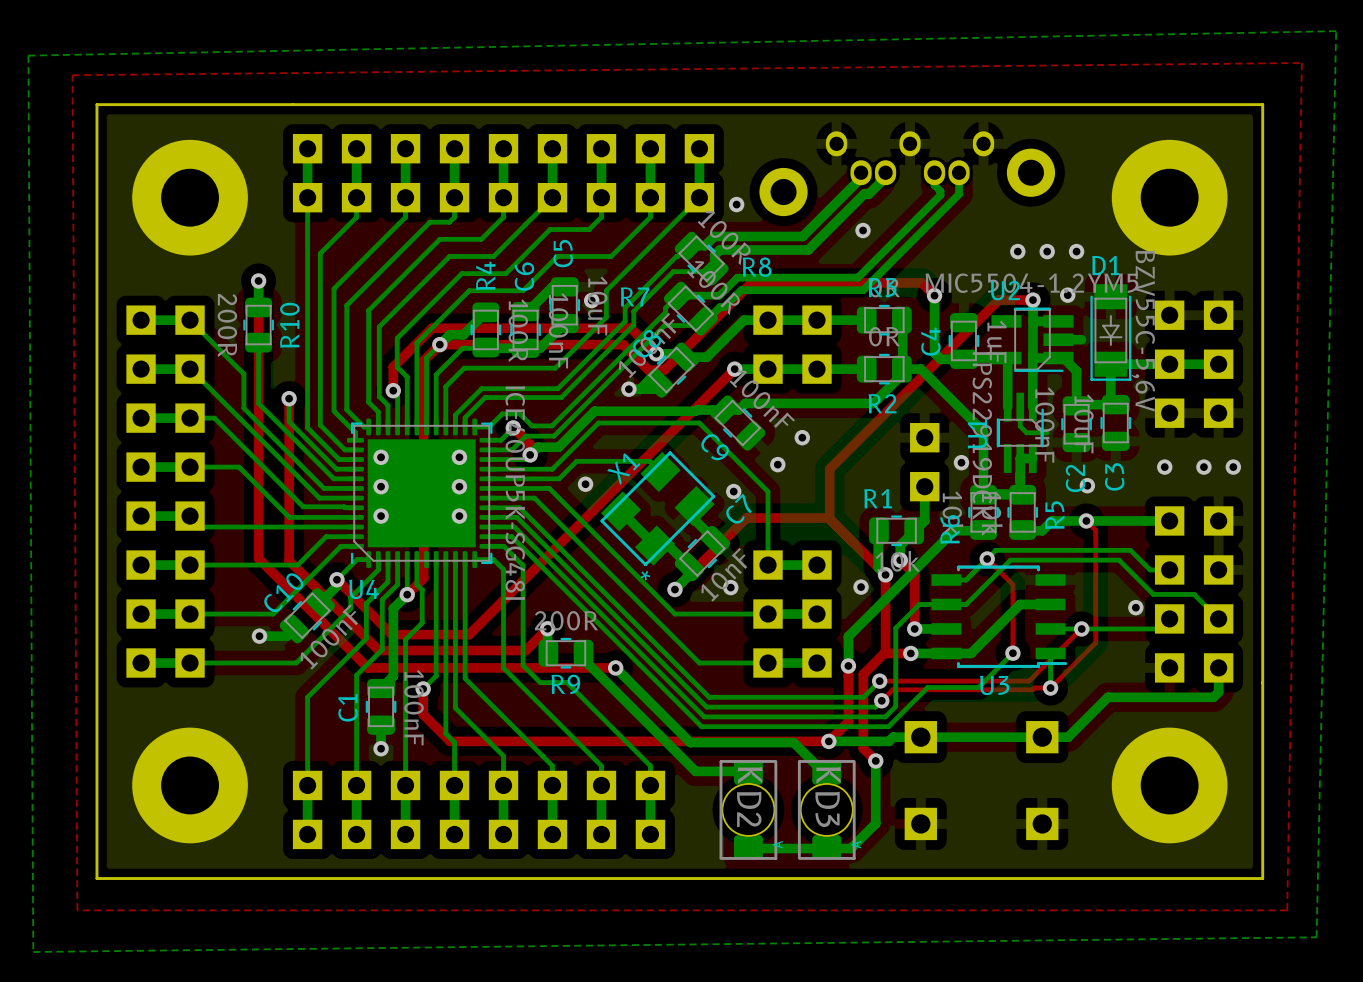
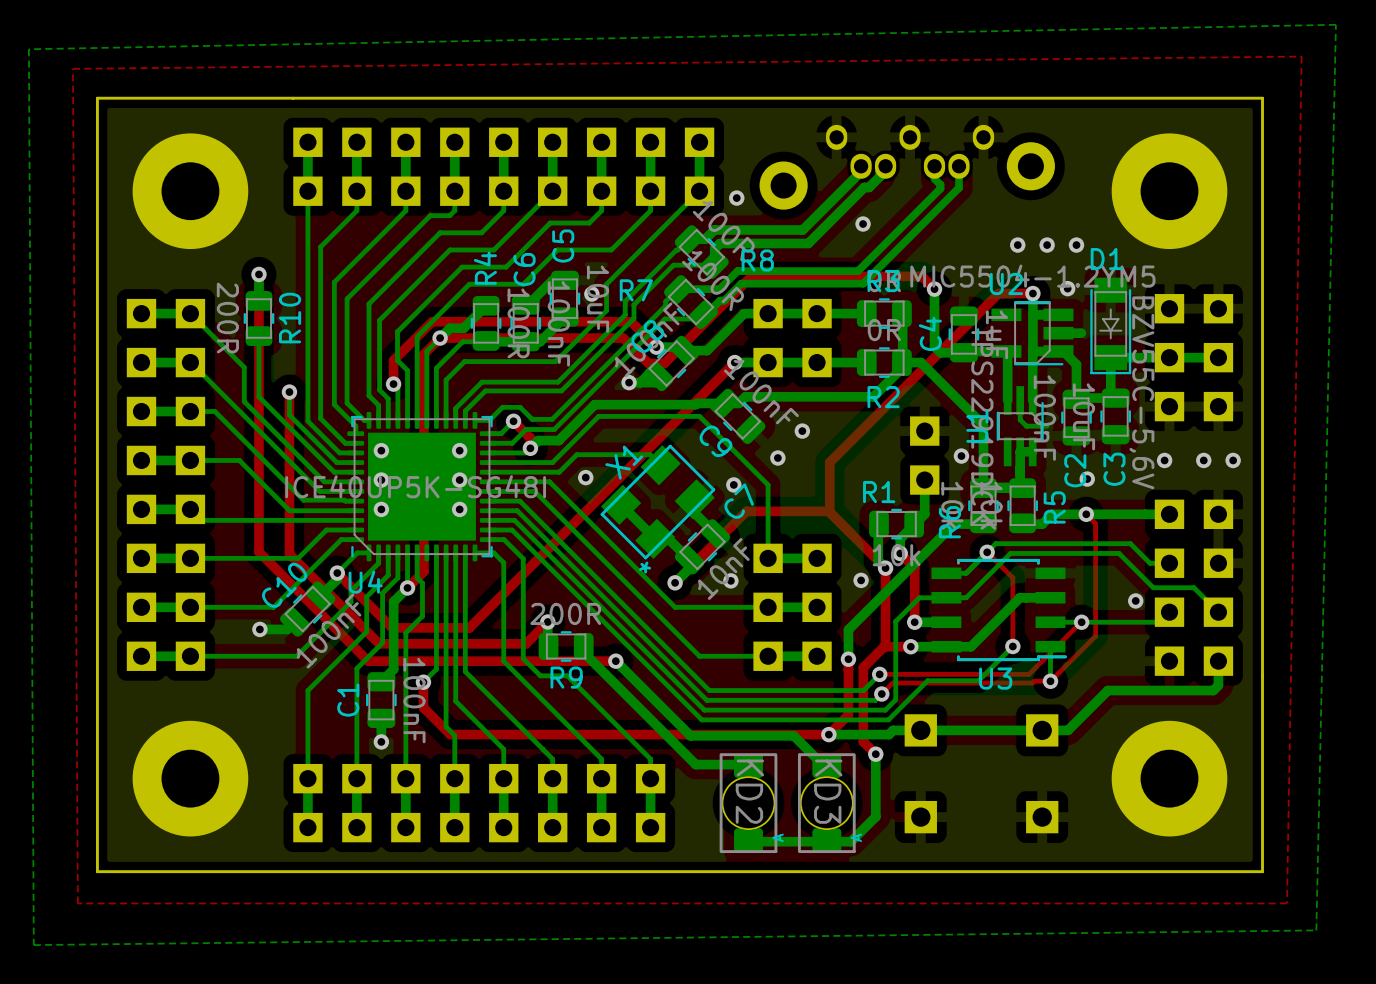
D1 value position: BZV55C-5,6V (1143, 331) -> BZV55C-5,6V (1141, 392)
U4 value rotation: 0° (515, 493) -> 90° counterclockwise (415, 486)

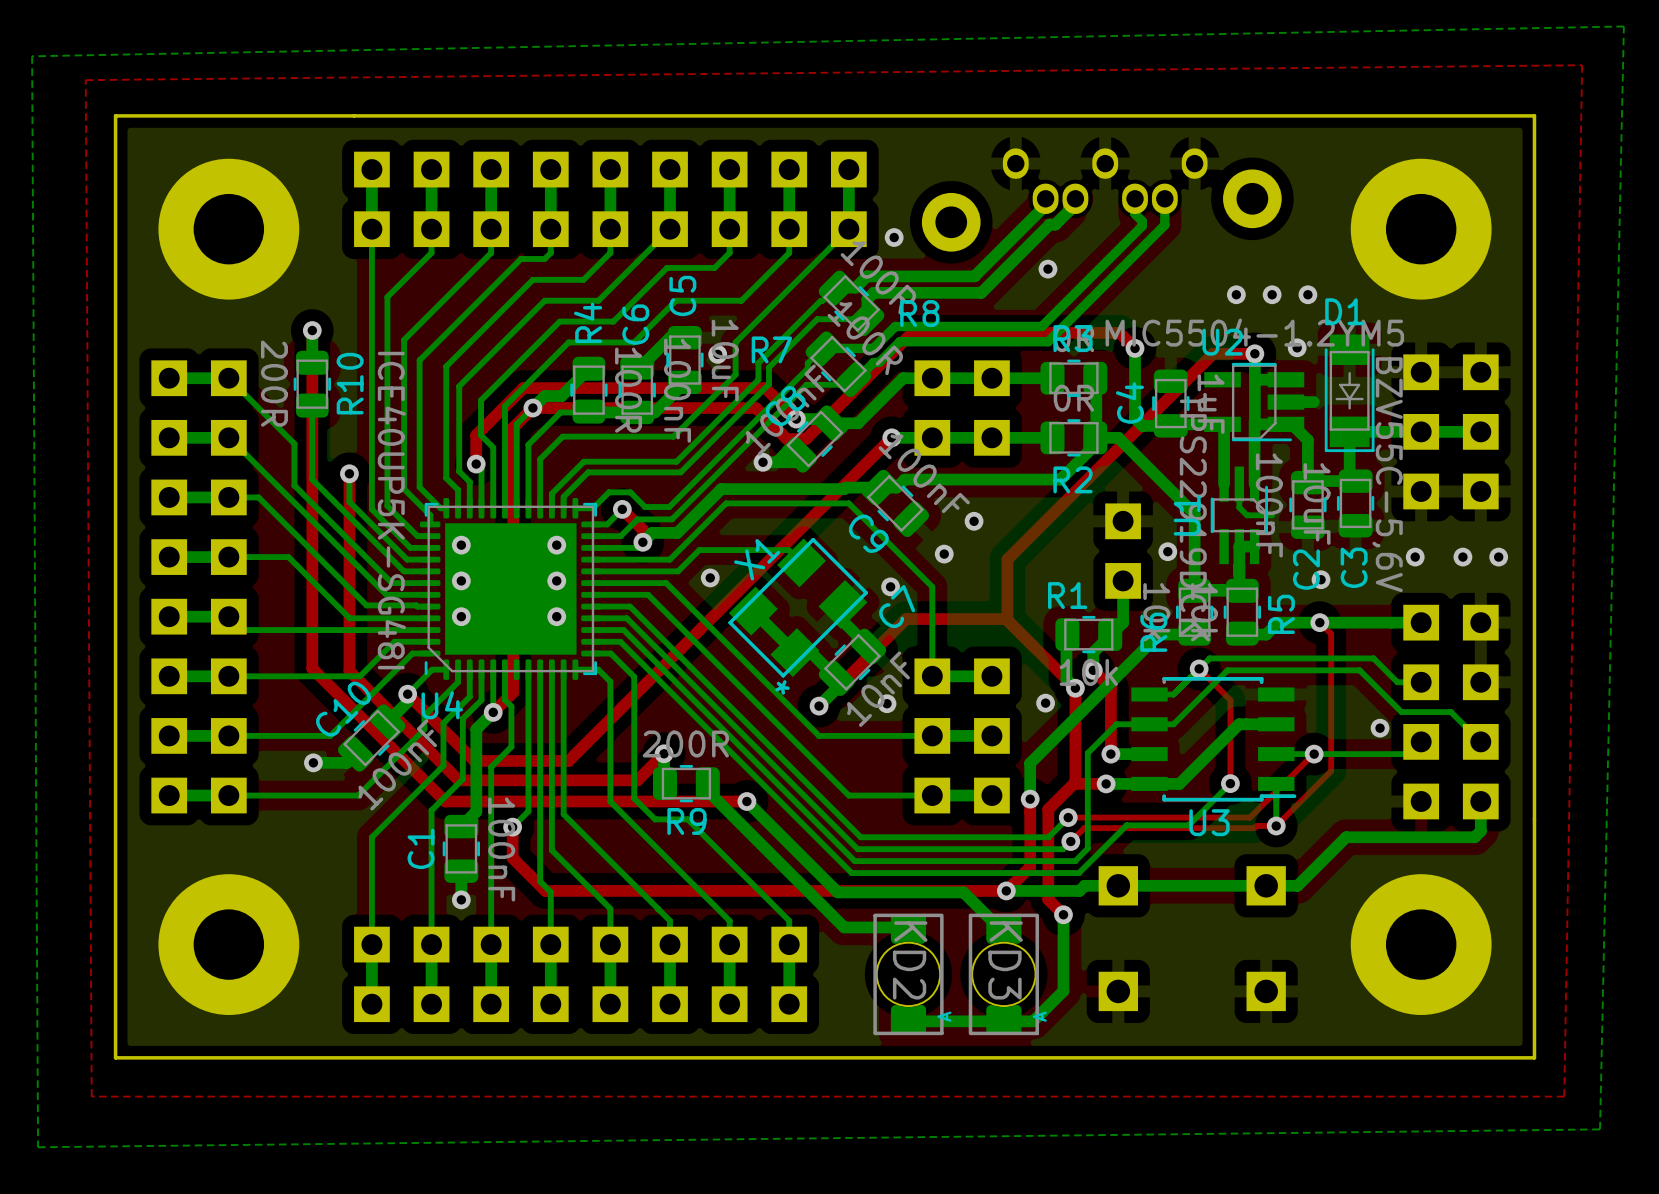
U4 value rotation: 0° (415, 486) -> 90° clockwise (391, 510)

